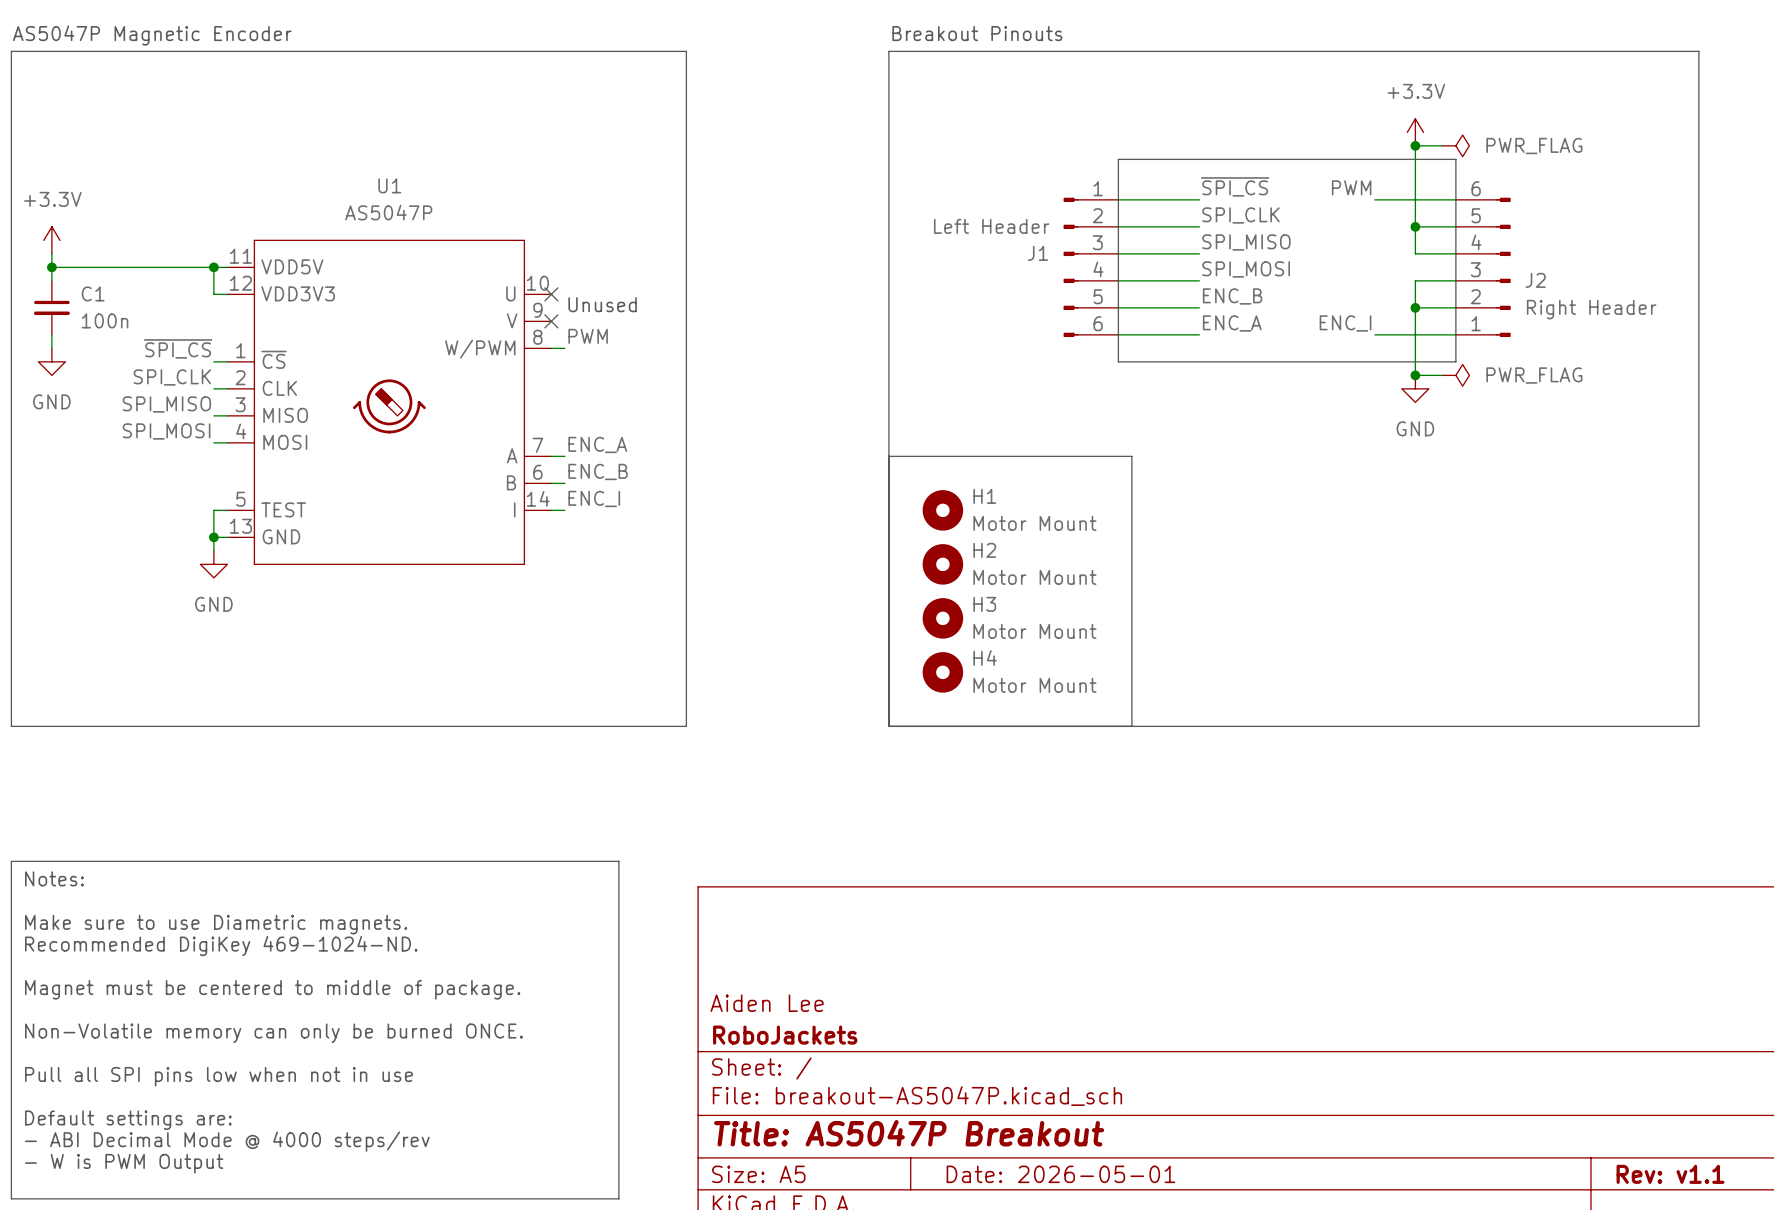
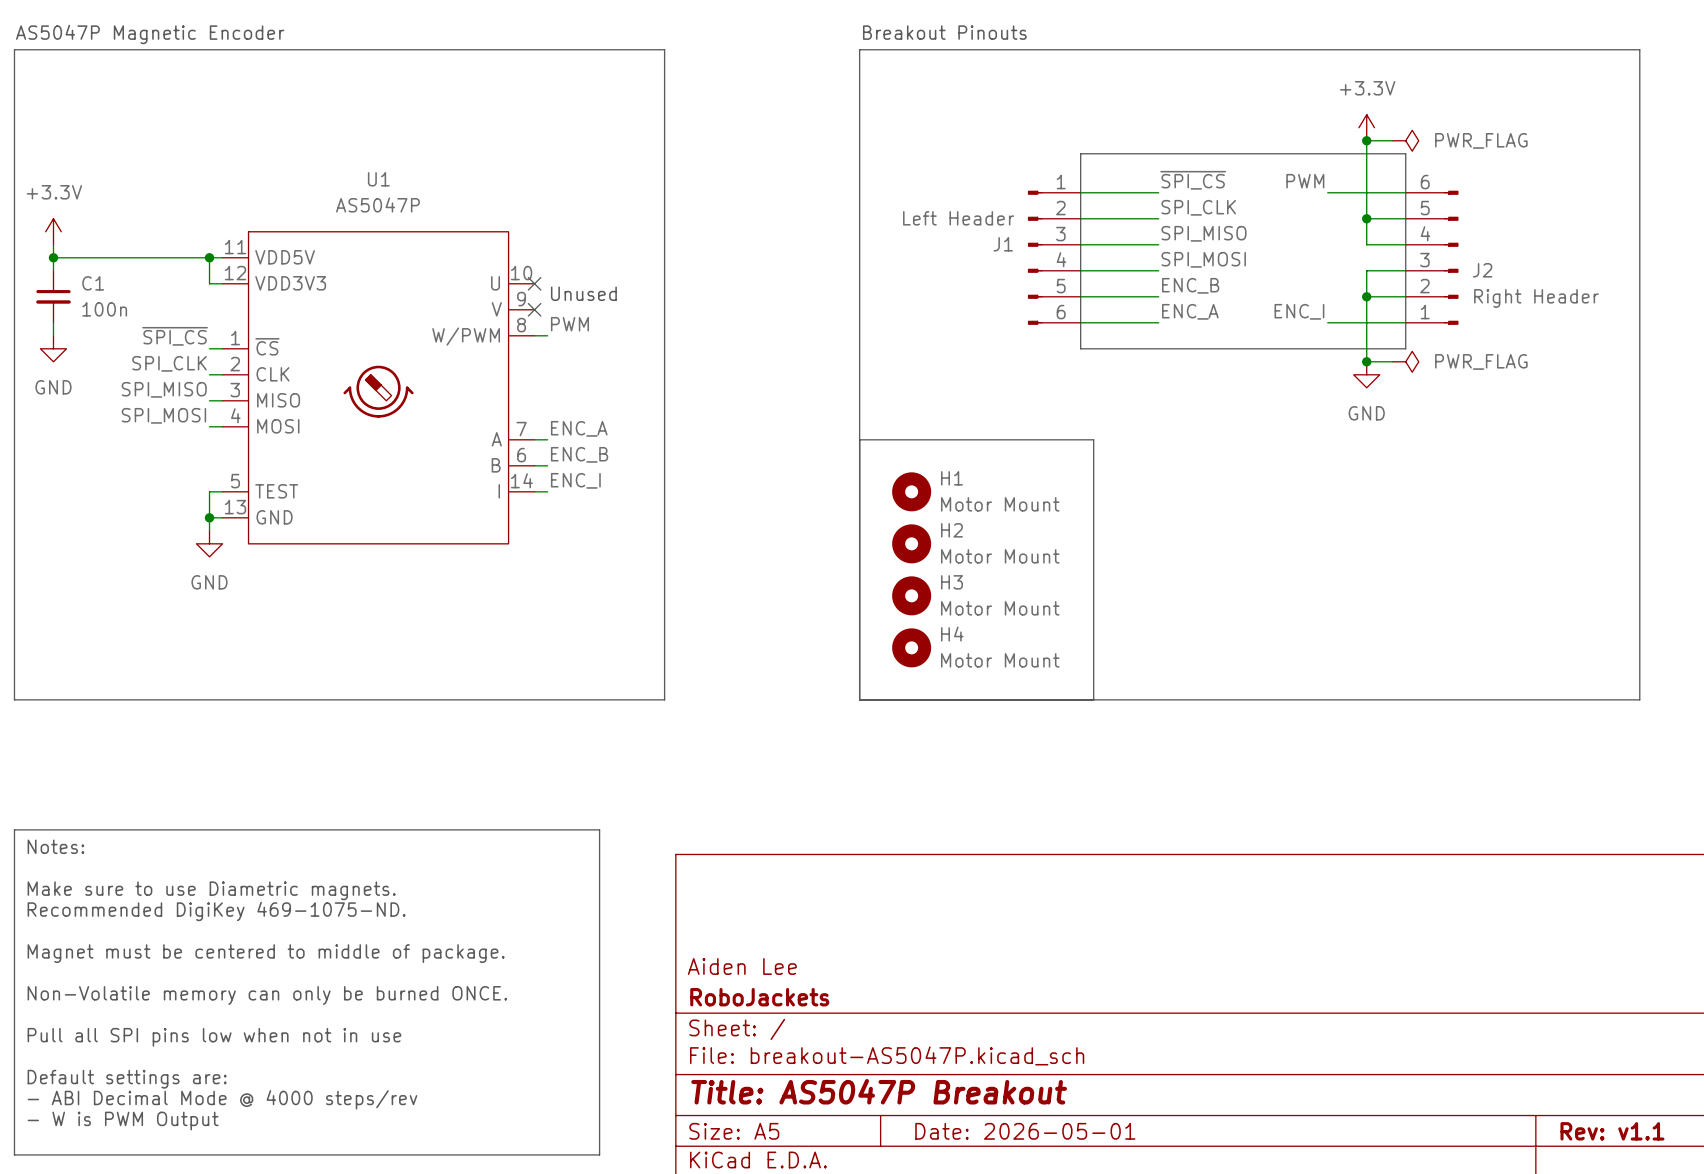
text: Recommended DigiKey 469-1024-ND. (221, 946) -> Recommended DigiKey 469-1075-ND. (216, 911)

